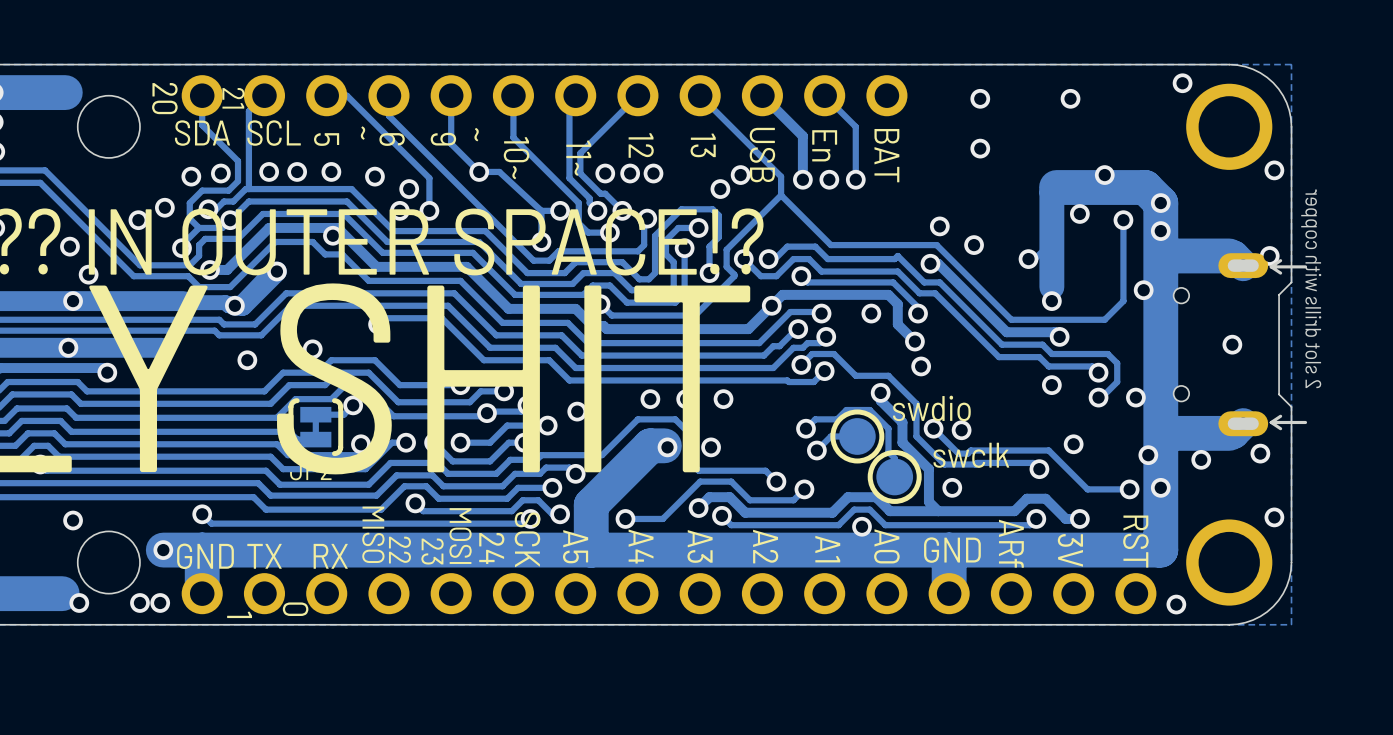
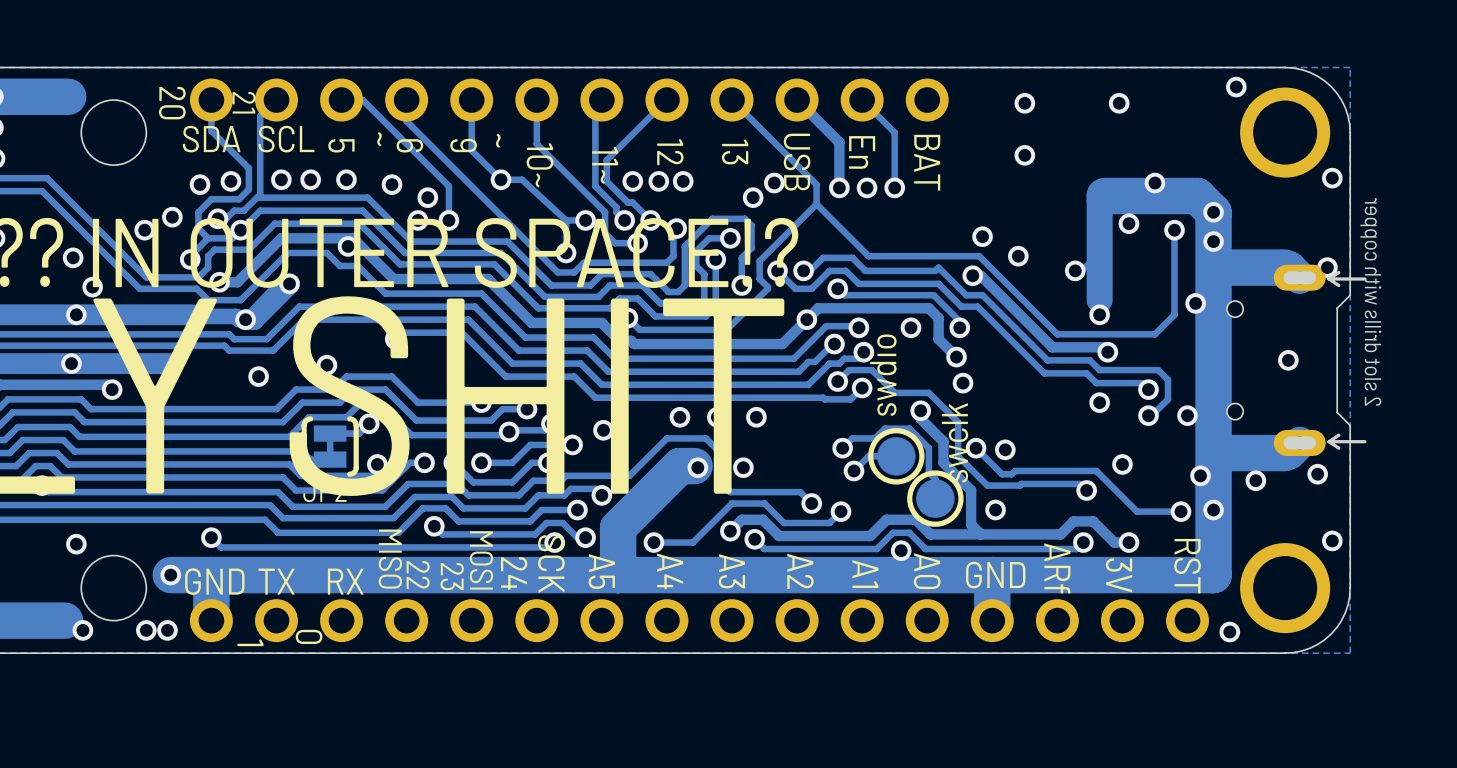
text rotation: 0° (931, 408) -> 90° counterclockwise (883, 375)
text rotation: 0° (971, 455) -> 90° counterclockwise (955, 442)

